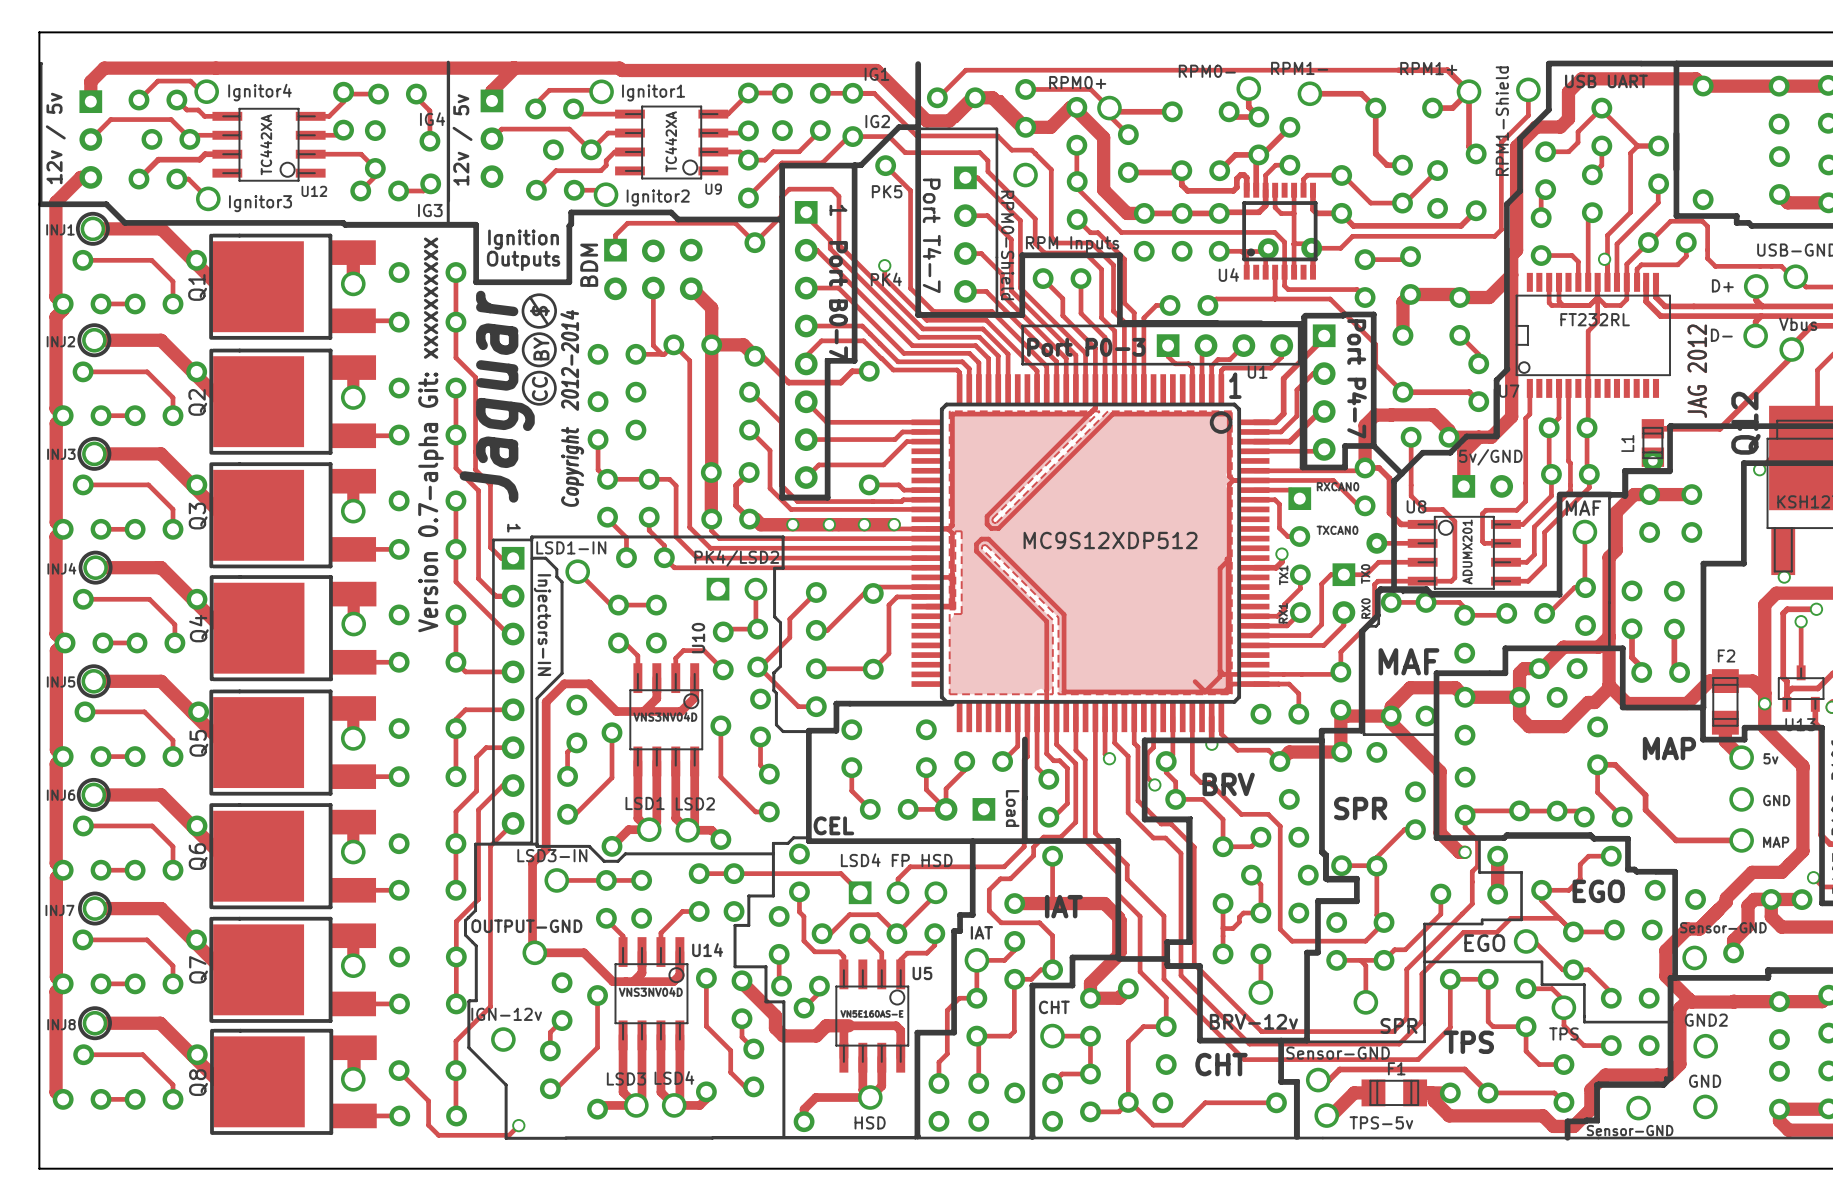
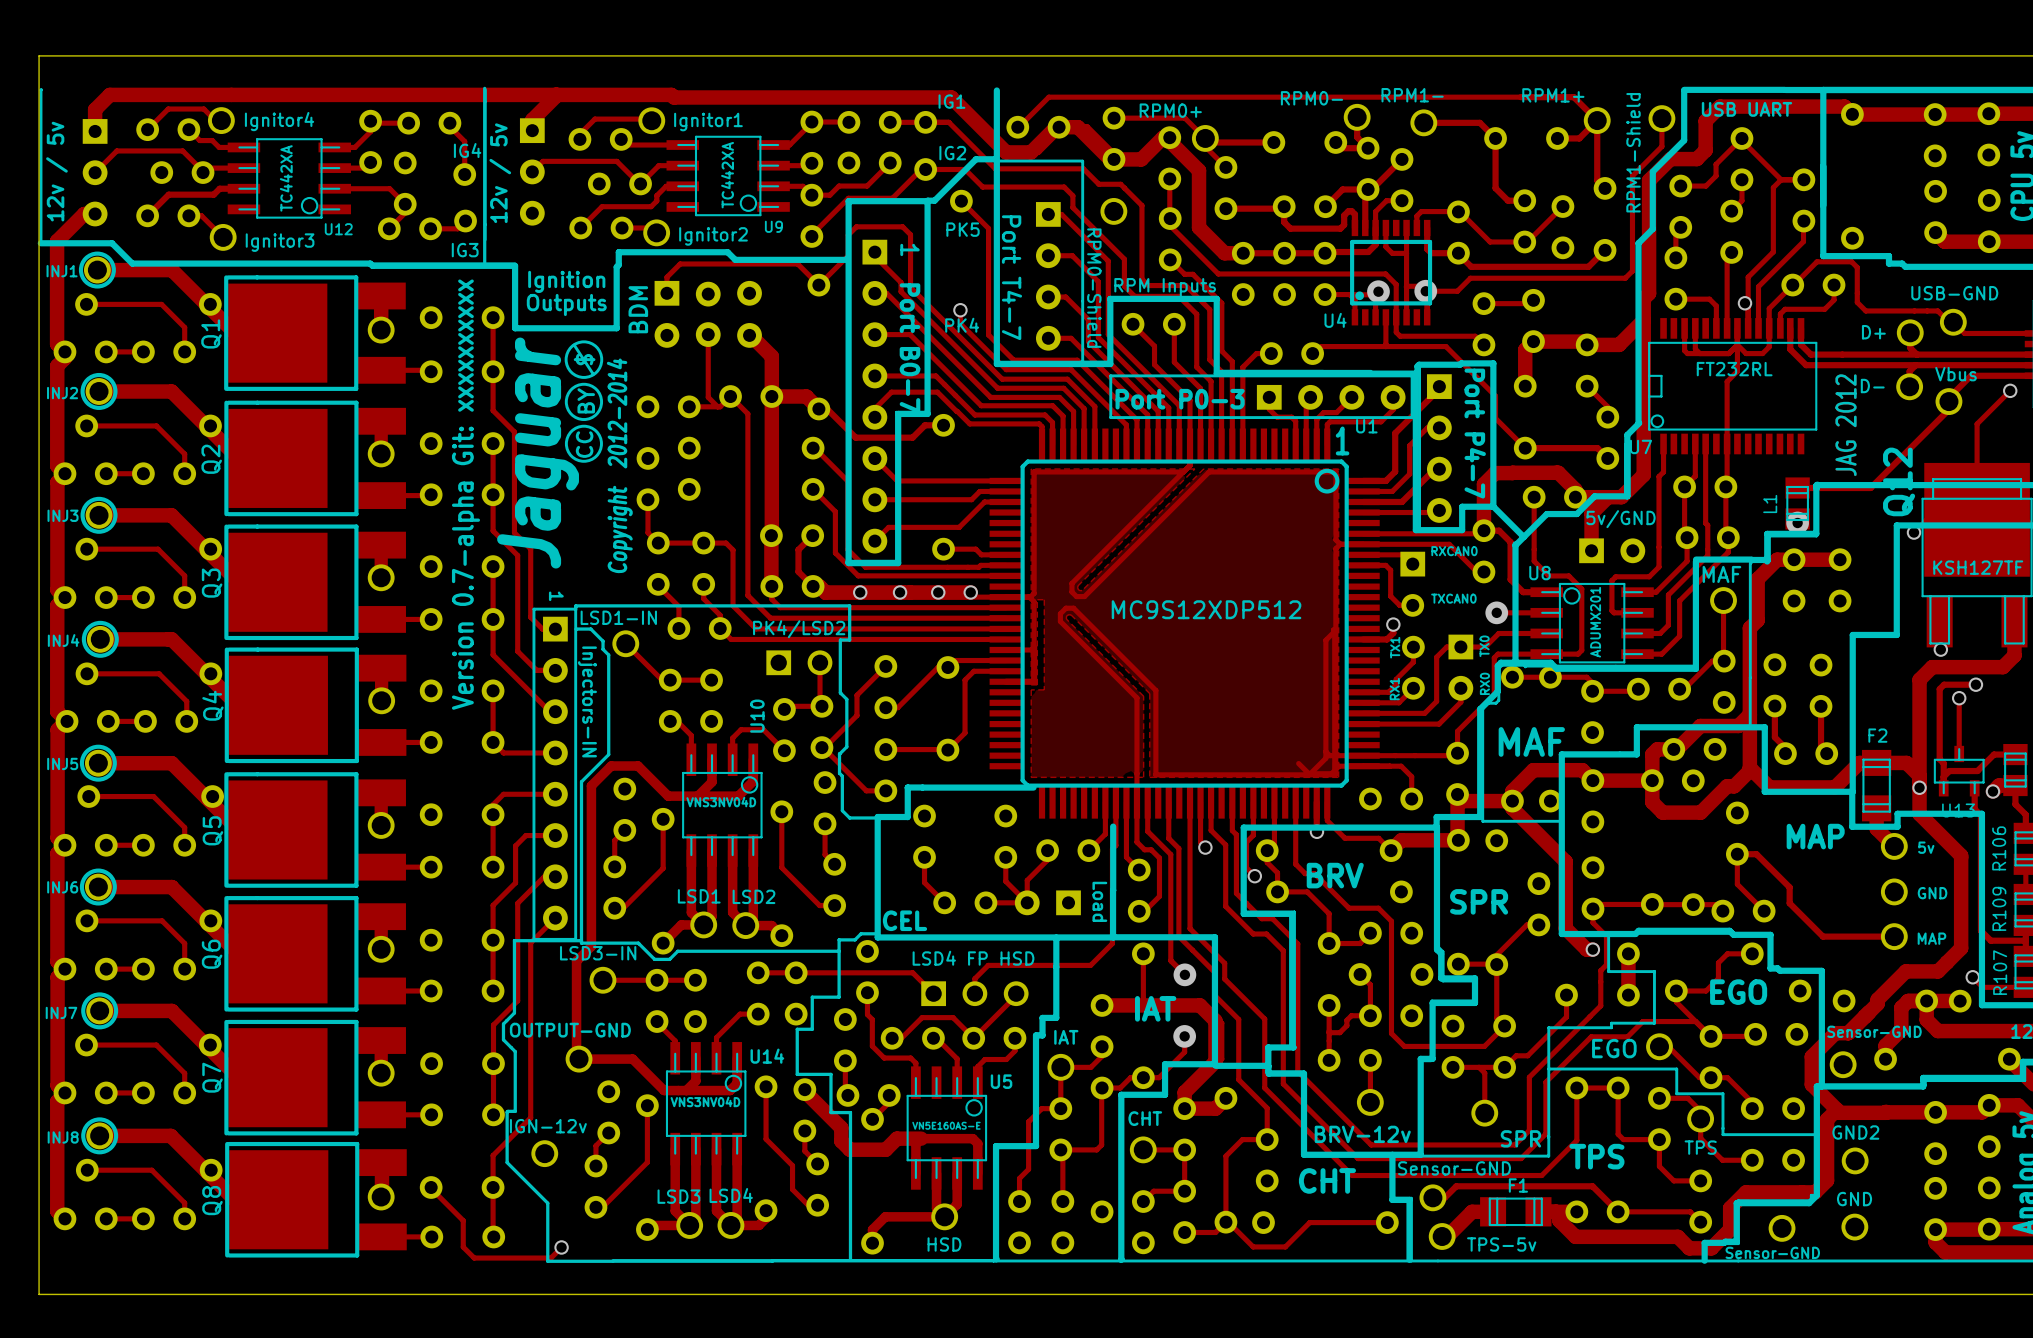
track: (1056, 743) (1075, 763) (1075, 822) (1060, 837) (1043, 837) (1033, 847) (1033, 855) (1010, 878) (1000, 878) (989, 890) (989, 910) (1001, 922) (1039, 922) (1052, 935) (1052, 969) -> (1147, 831) (1170, 854) (1170, 960) (1184, 974)
via: none -> (1184, 974)
track: none -> (1184, 1036) (1184, 1052) (1159, 1077) (1143, 1077)
via: none -> (1184, 1036)

